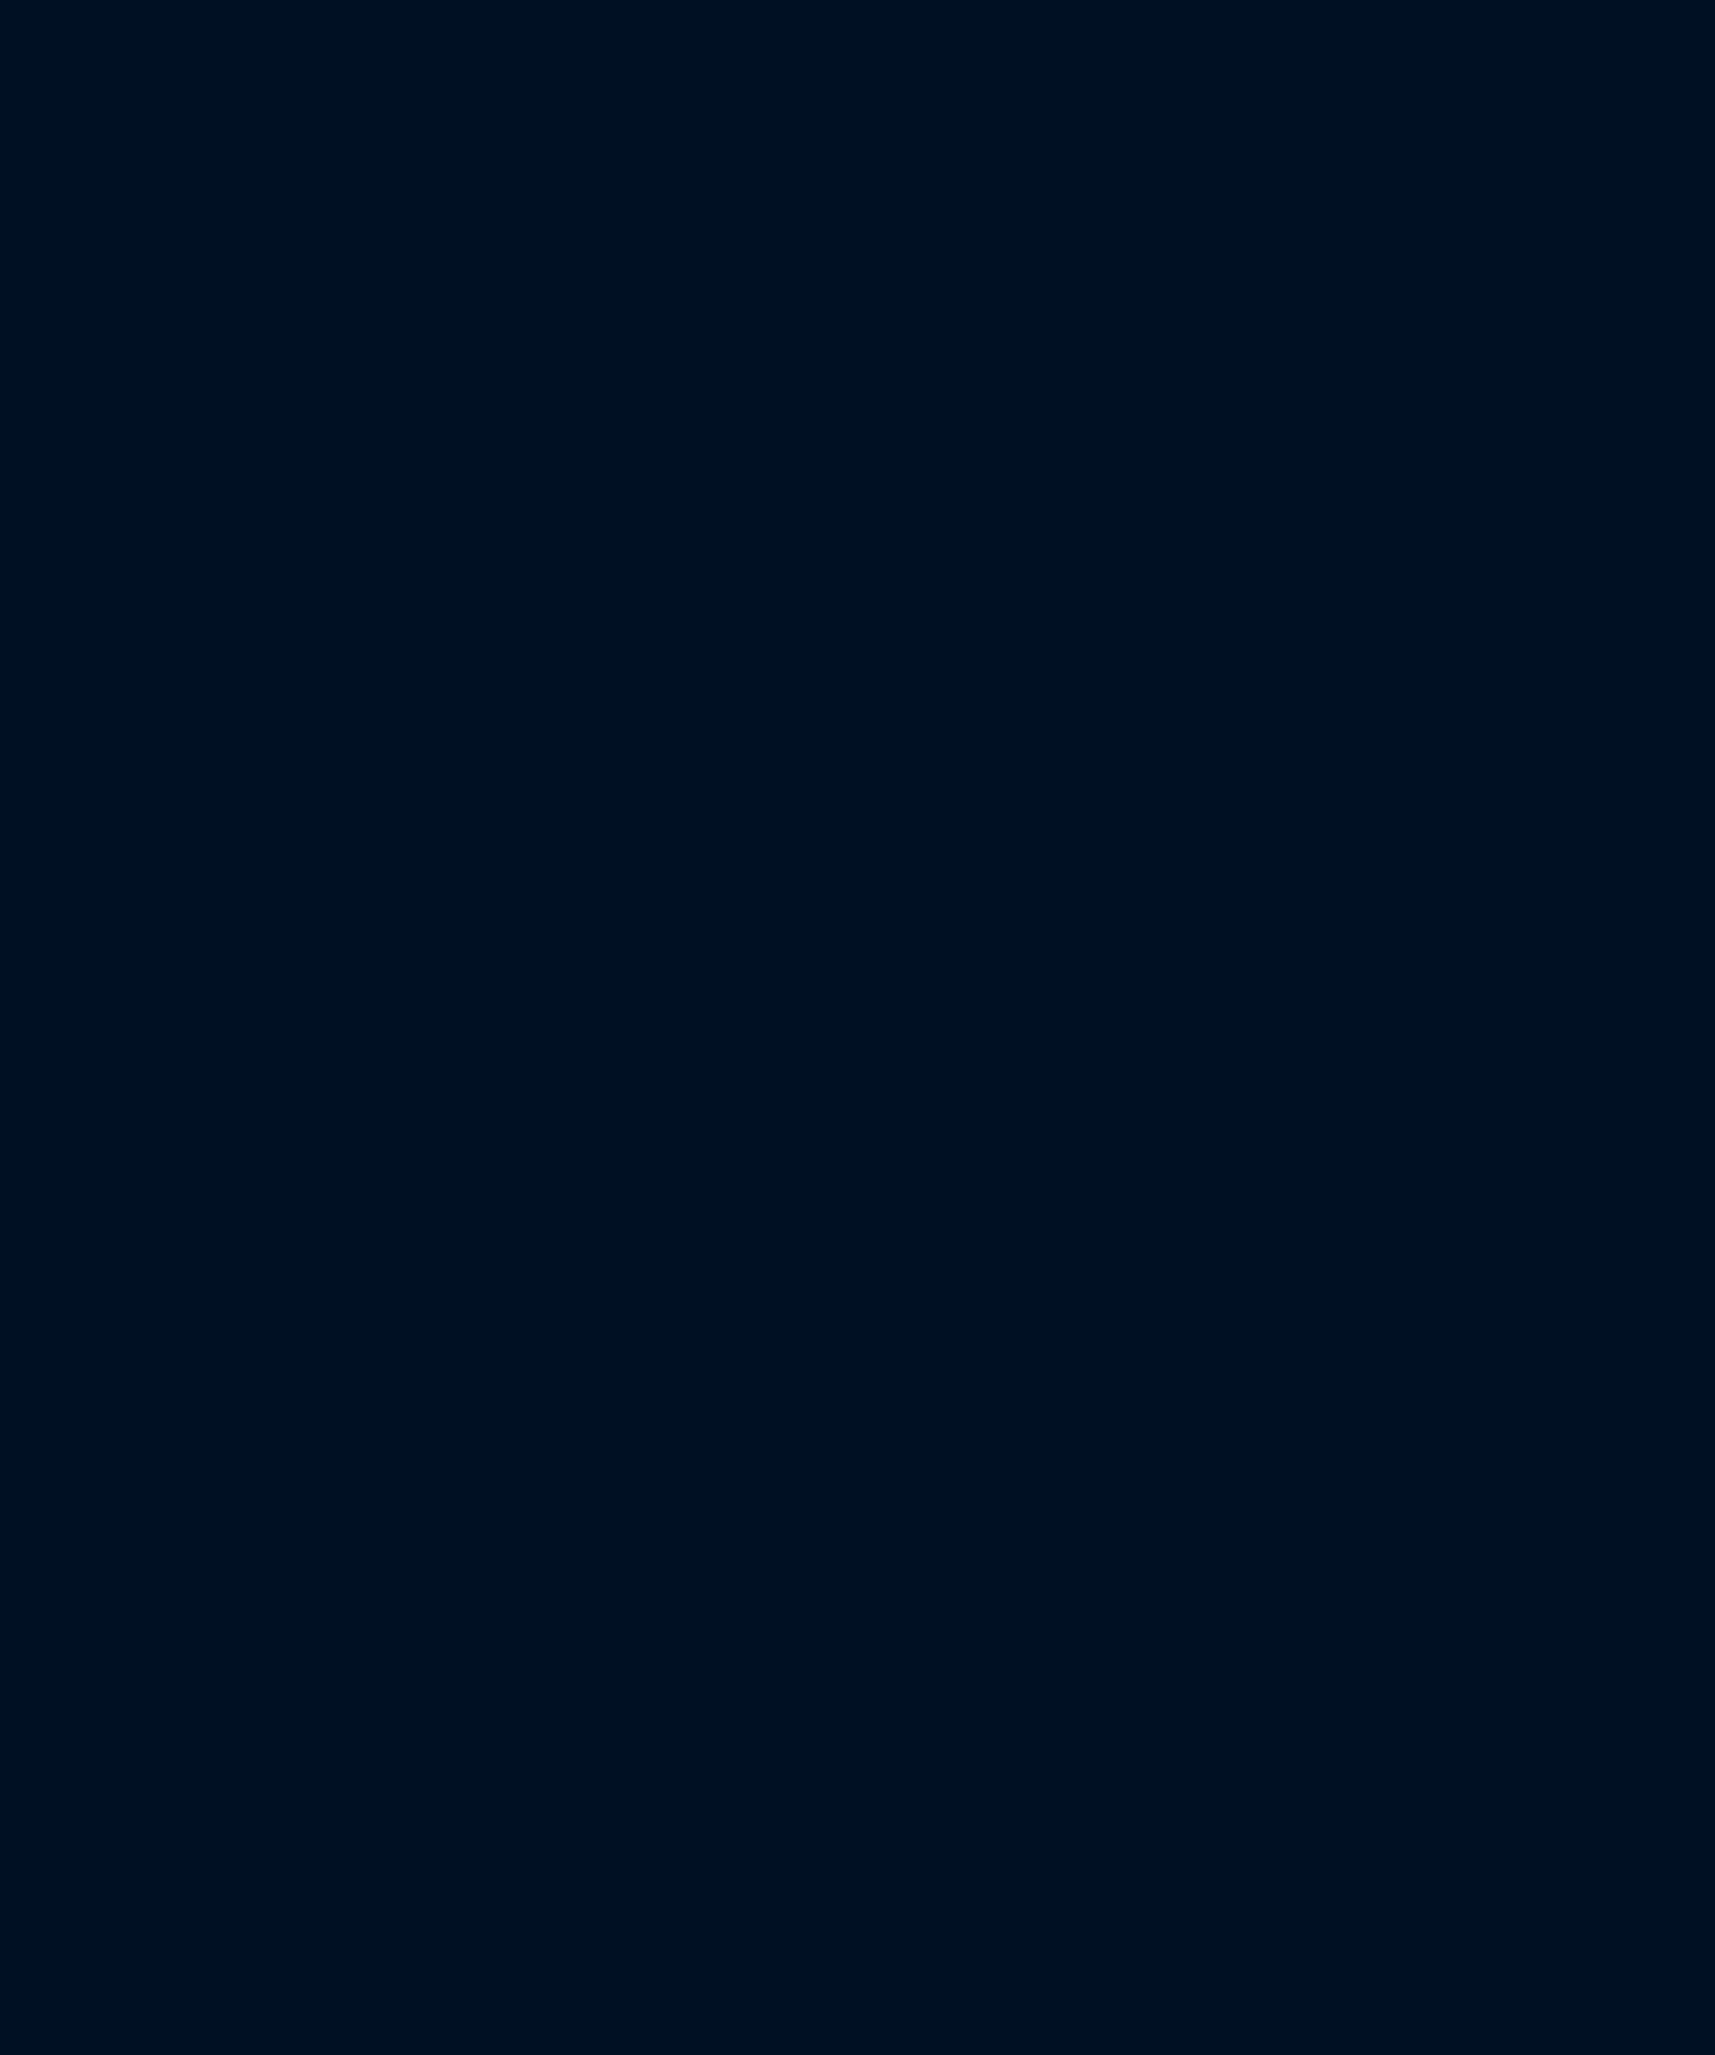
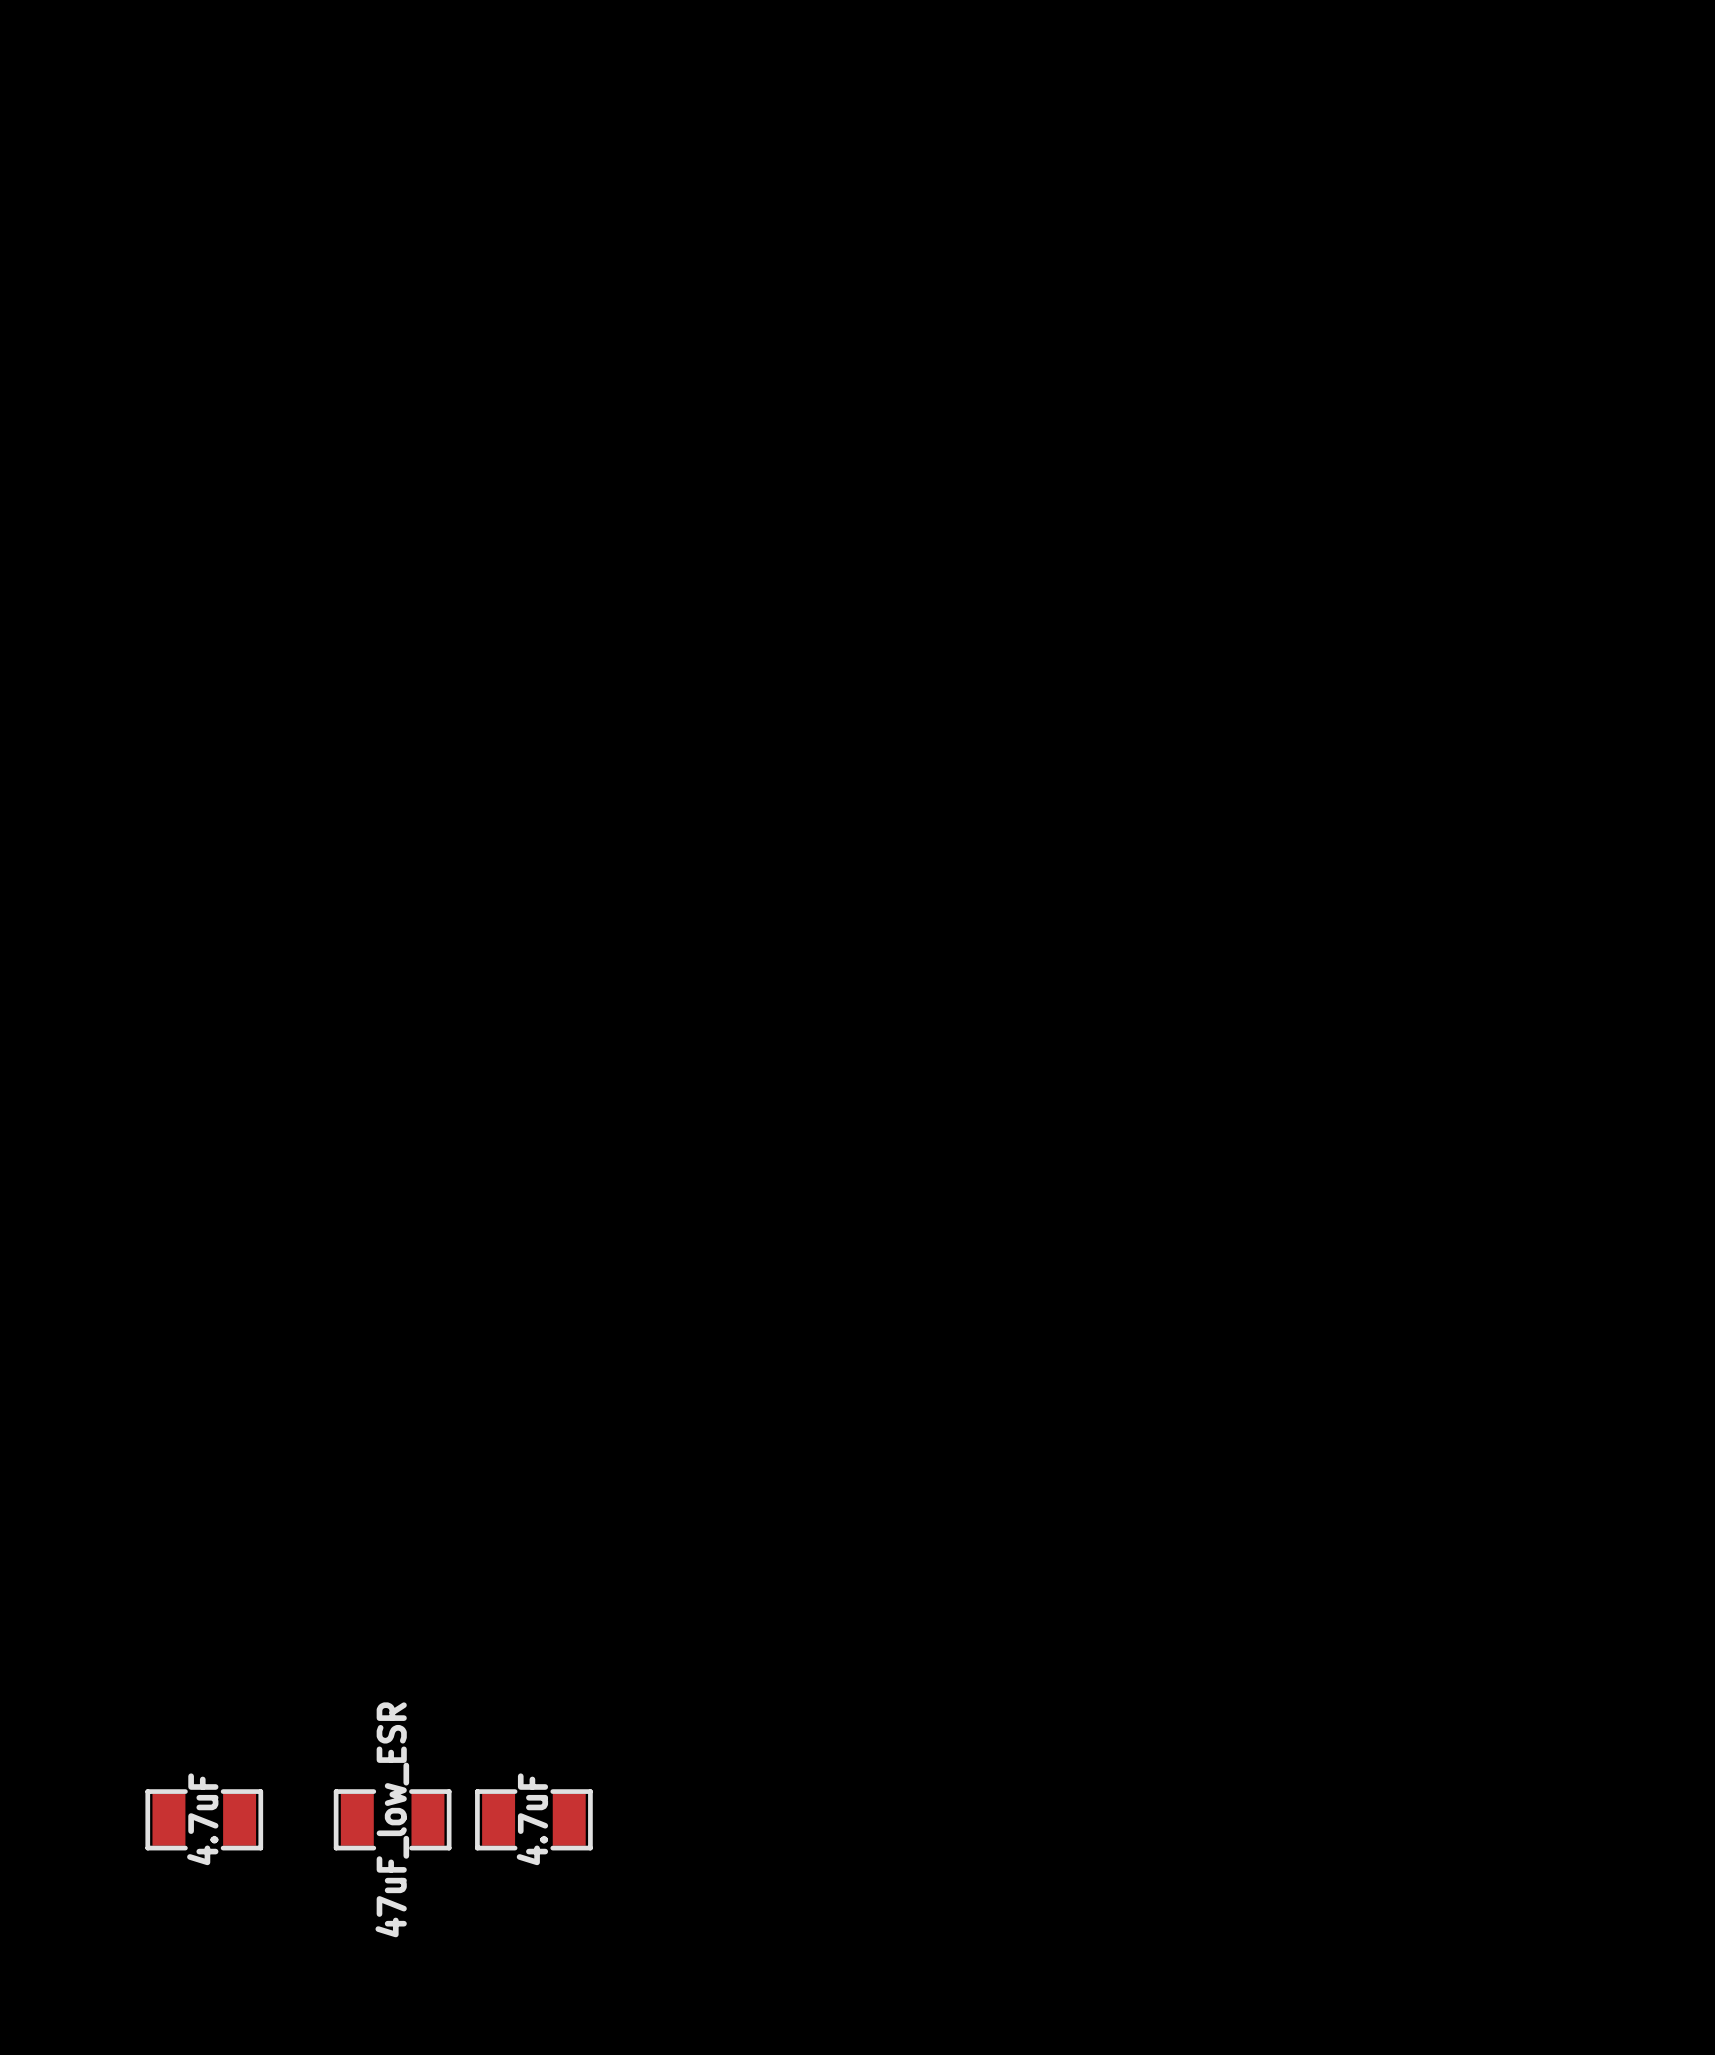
part: none -> 4.7uF (204, 1819)
part: none -> 47uF_low_ESR (392, 1819)
part: none -> 4.7uF (533, 1819)

